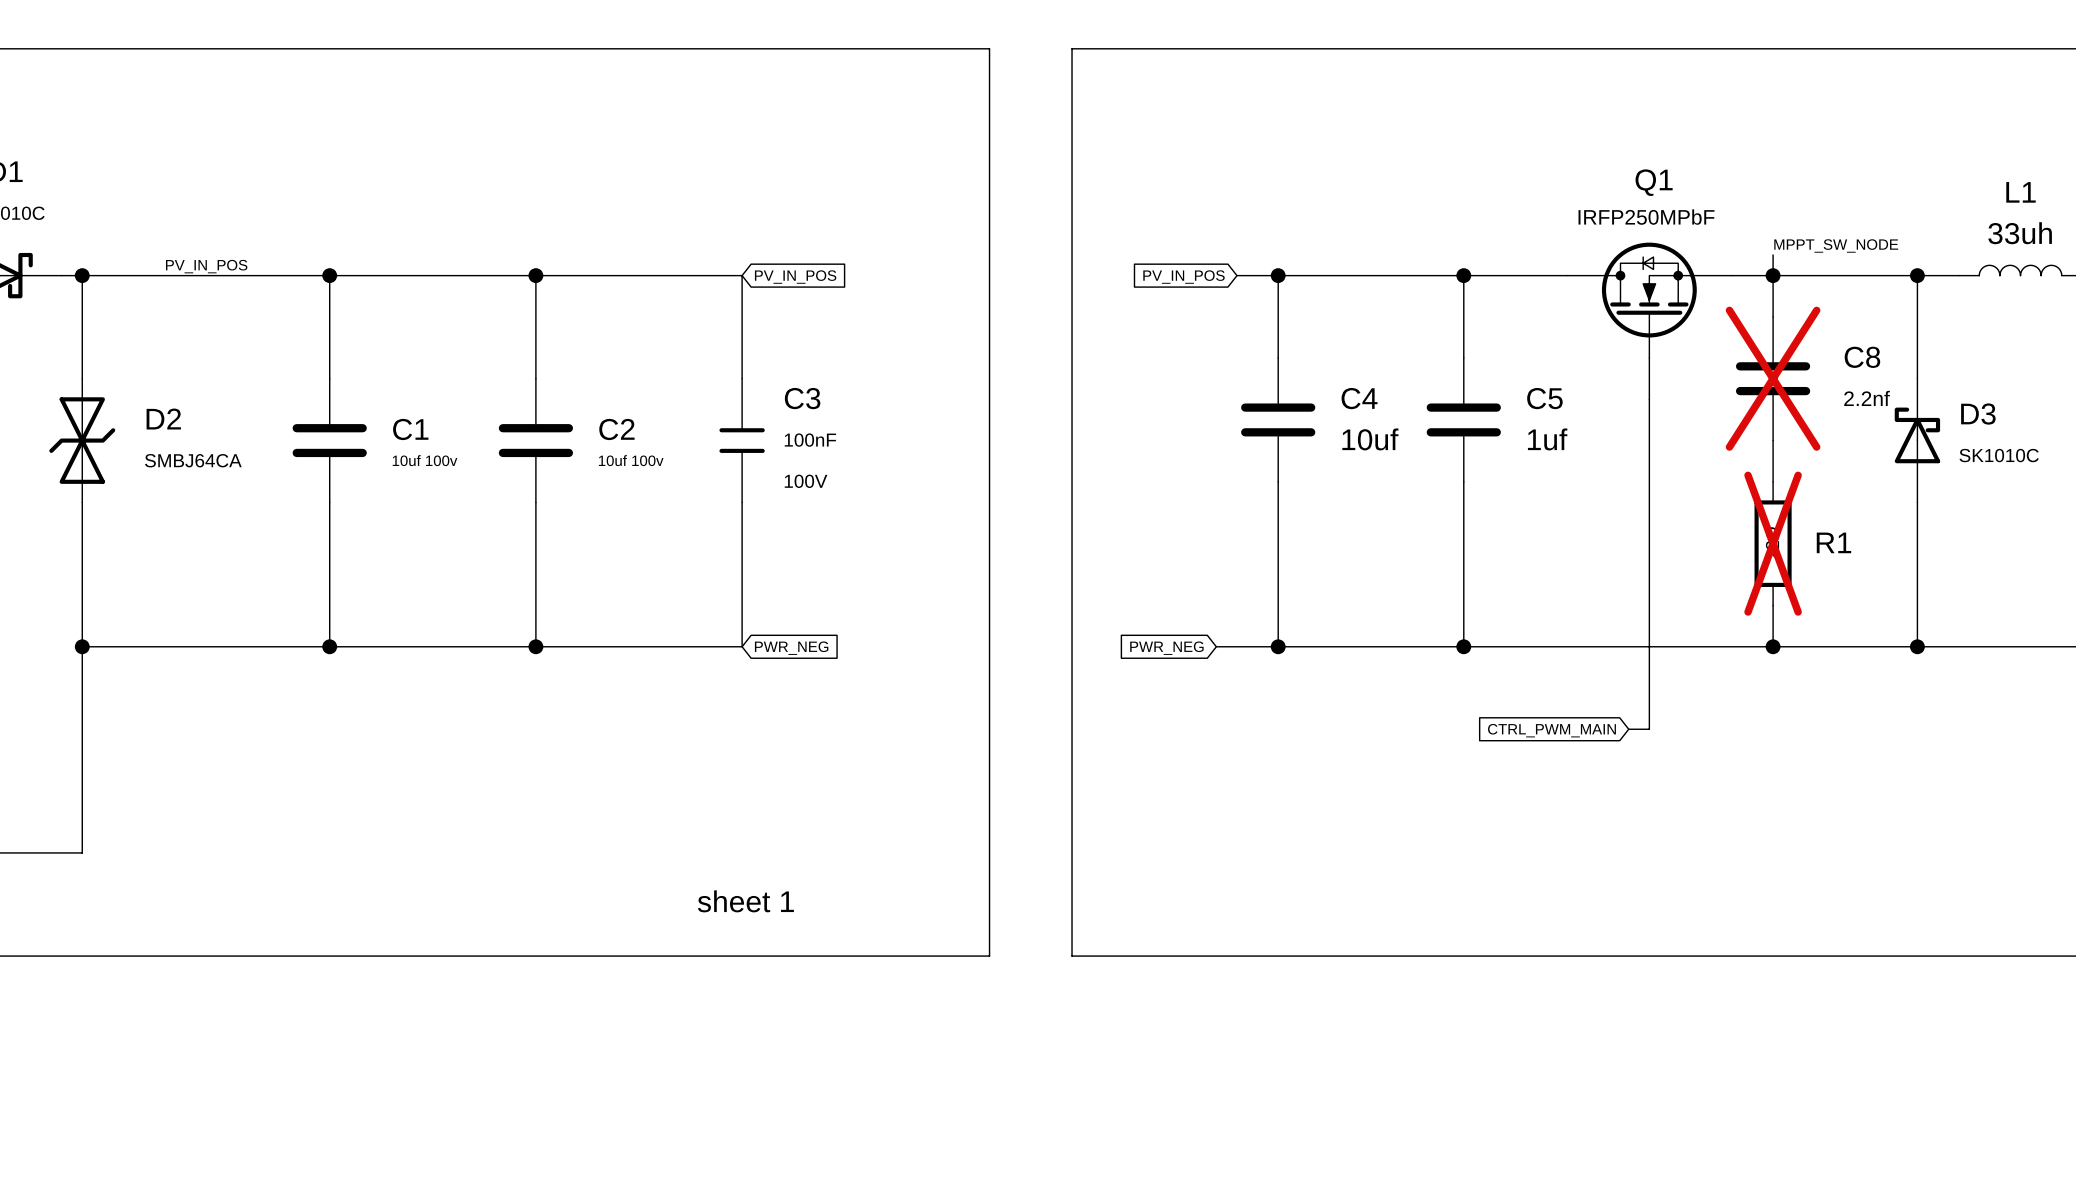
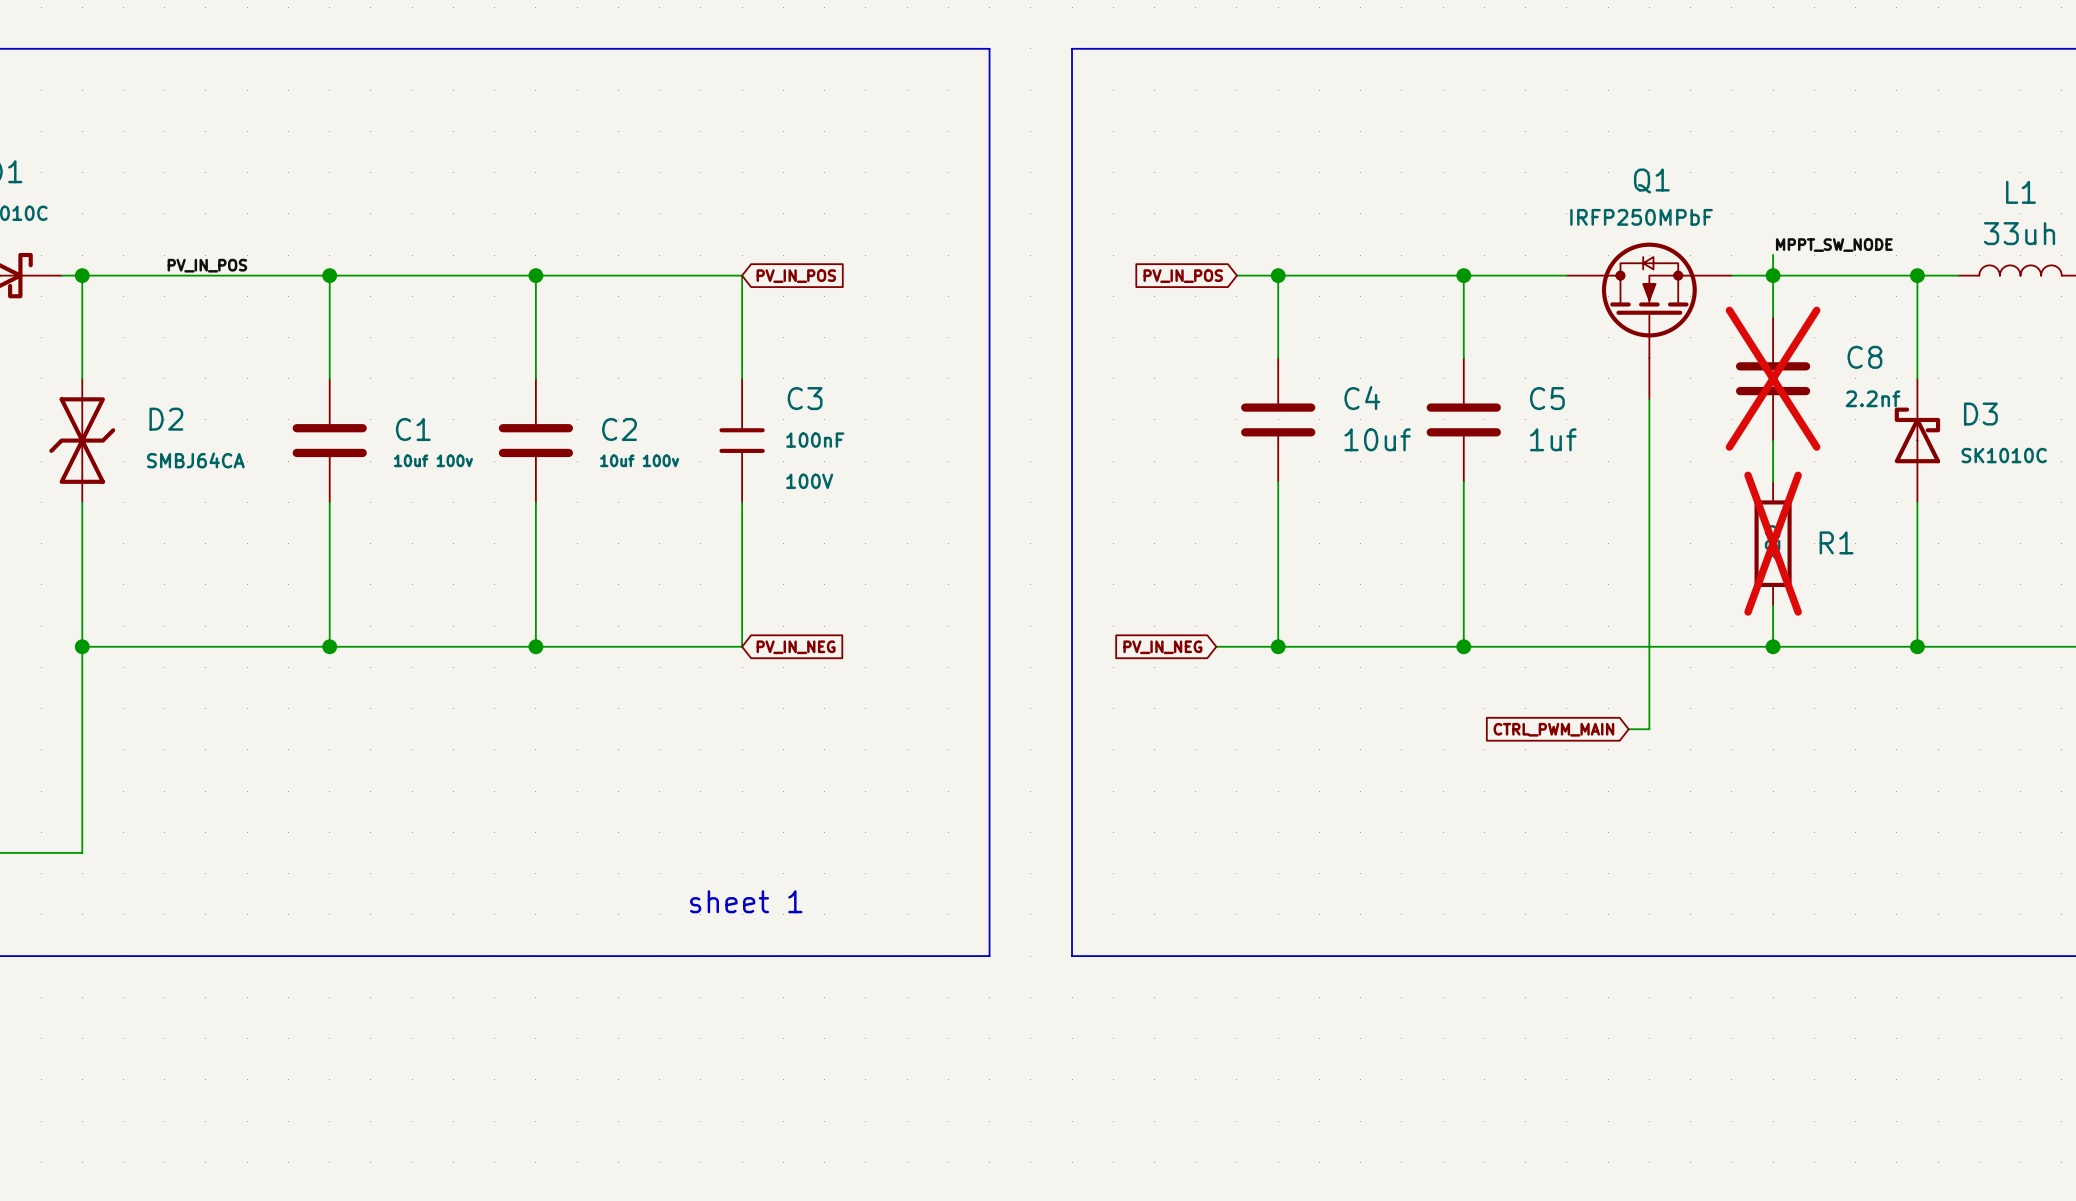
global label: PWR_NEG (791, 648) -> PV_IN_NEG (796, 647)
global label: PWR_NEG (1166, 648) -> PV_IN_NEG (1162, 647)

